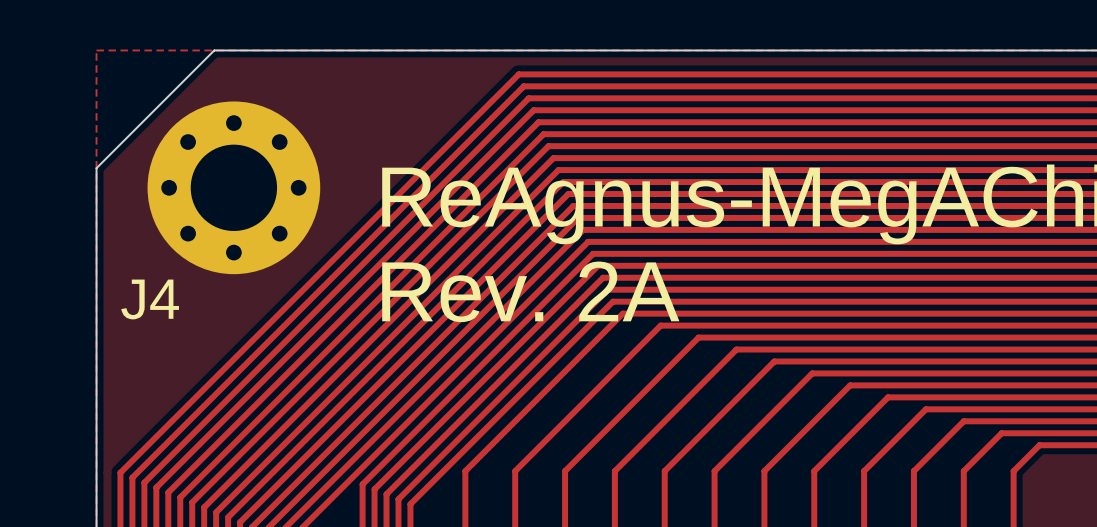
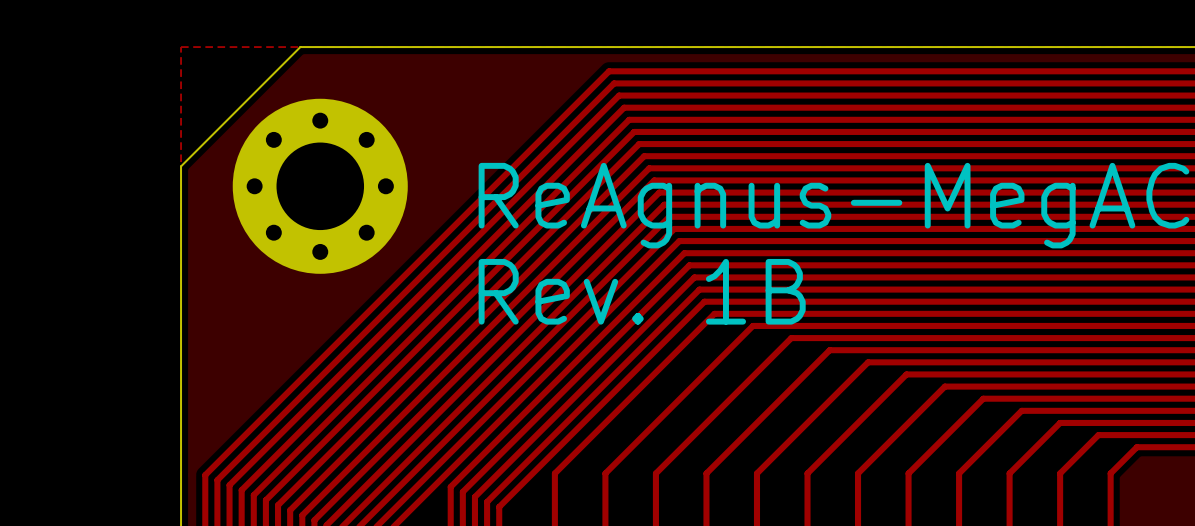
text: Rev. 2A (530, 291) -> Rev. 1B (642, 291)
J4 name: J4 (150, 299) -> none

